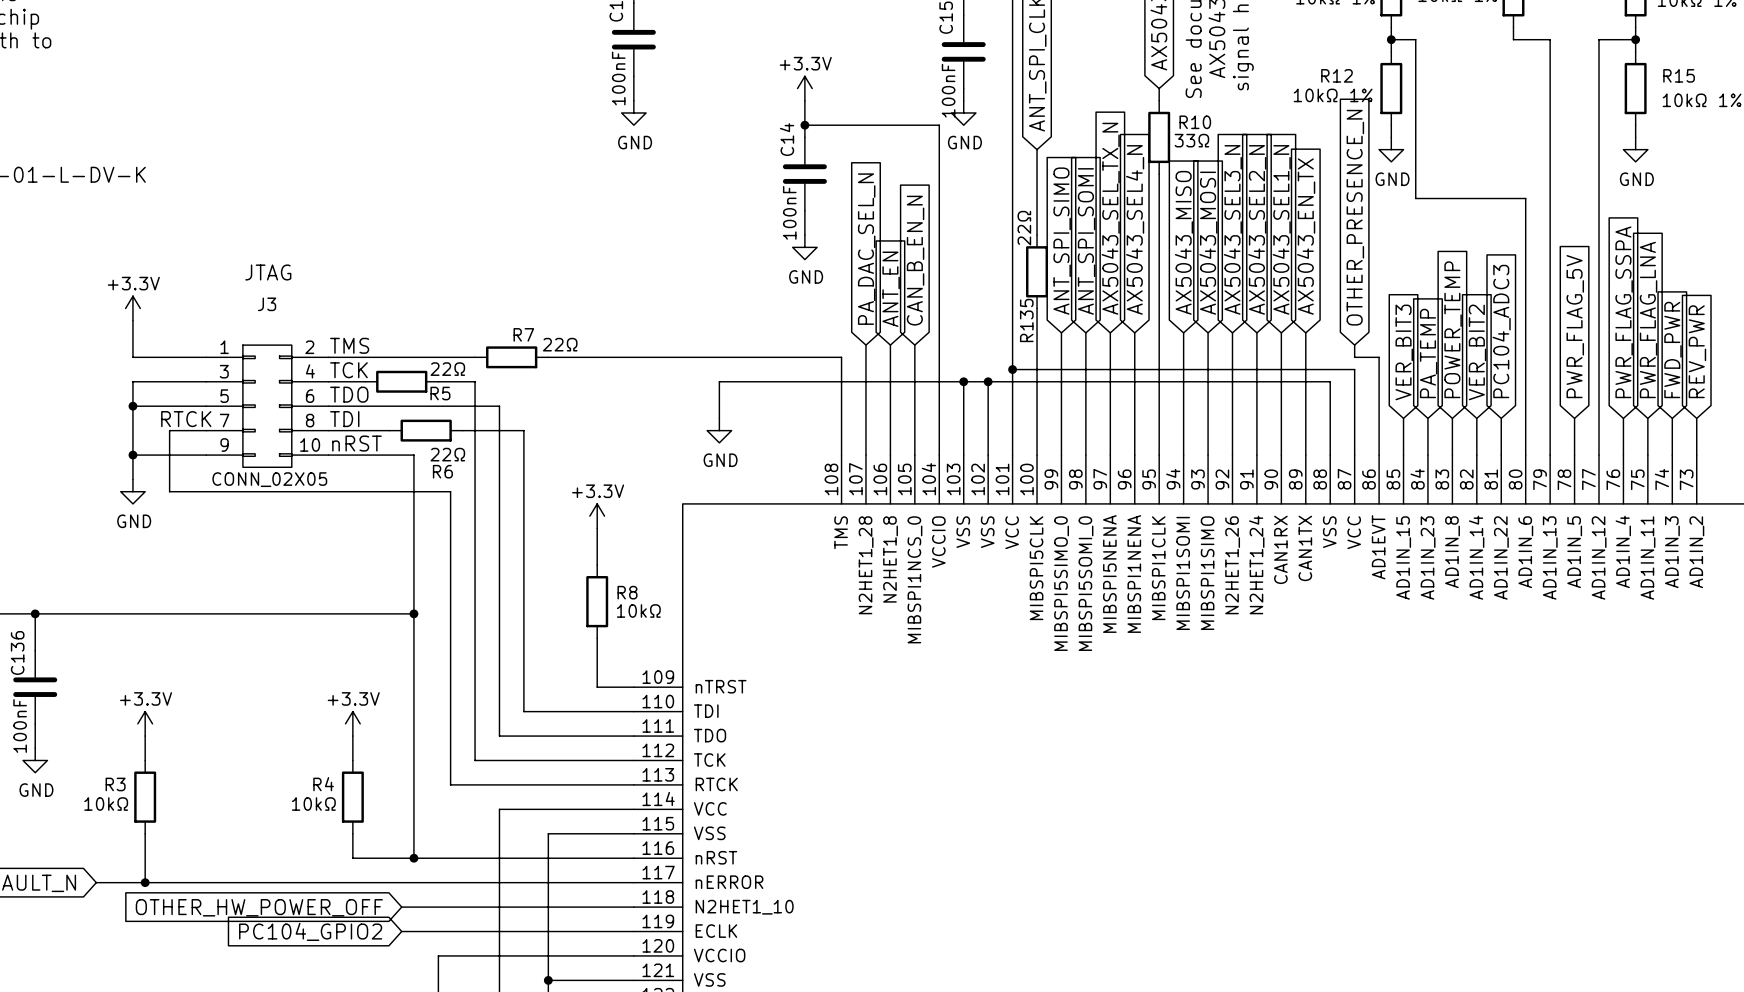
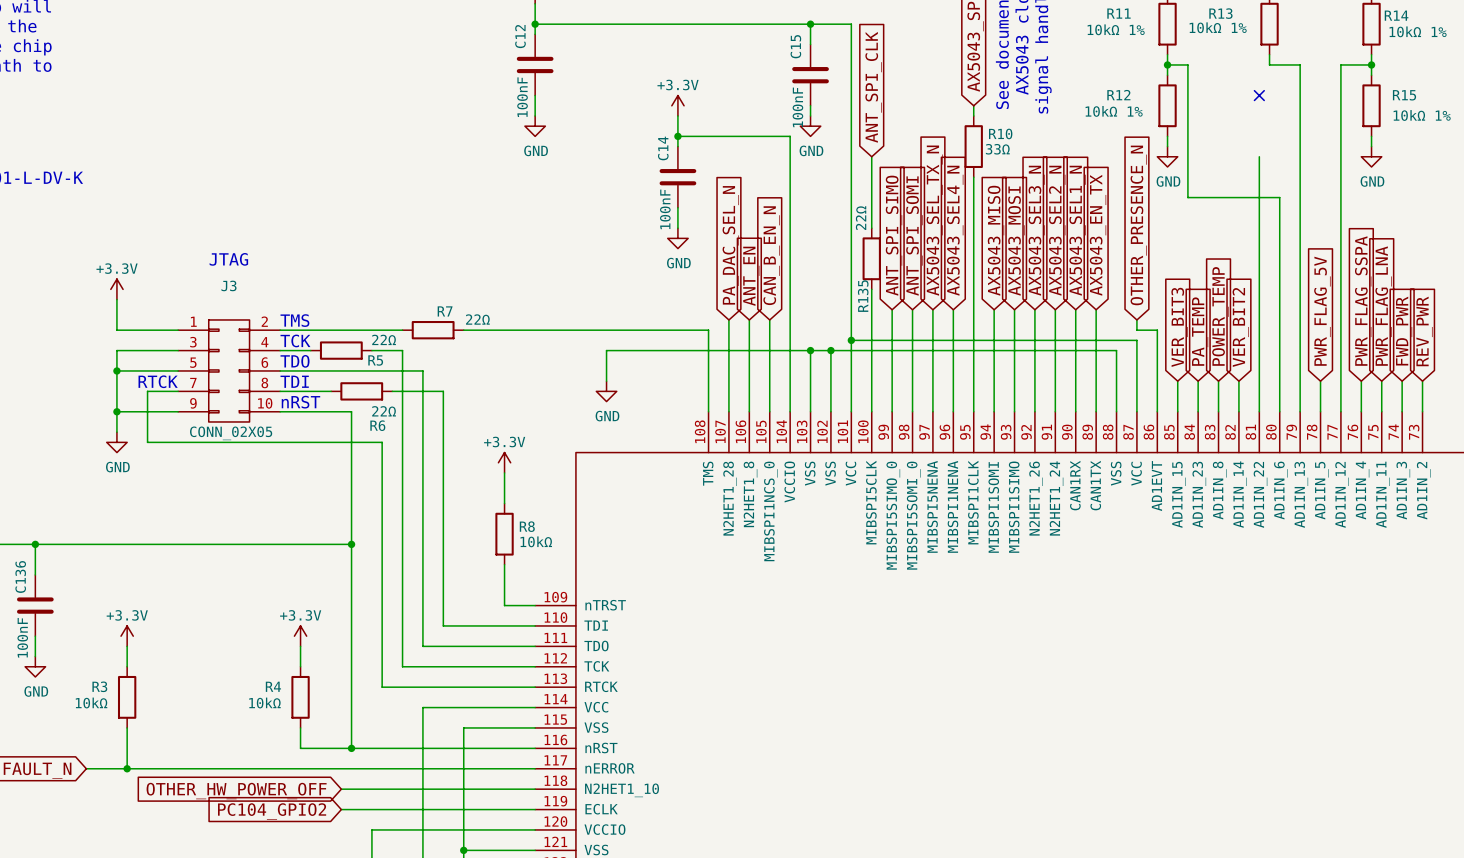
no-connect mark: none -> (1259, 95)
wire: none -> (1259, 156) (1259, 381)
global label: PC104_ADC3 (1501, 331) -> none

